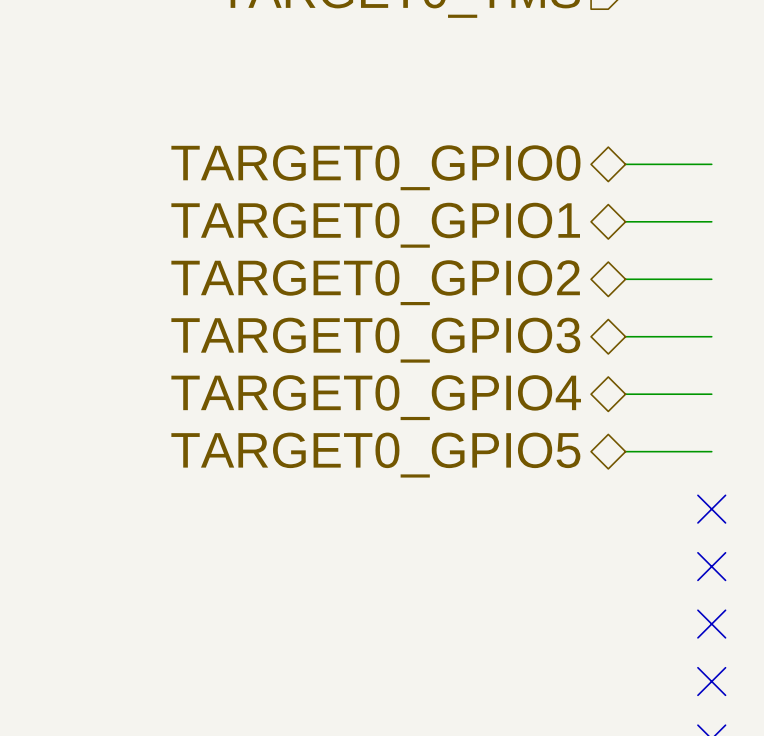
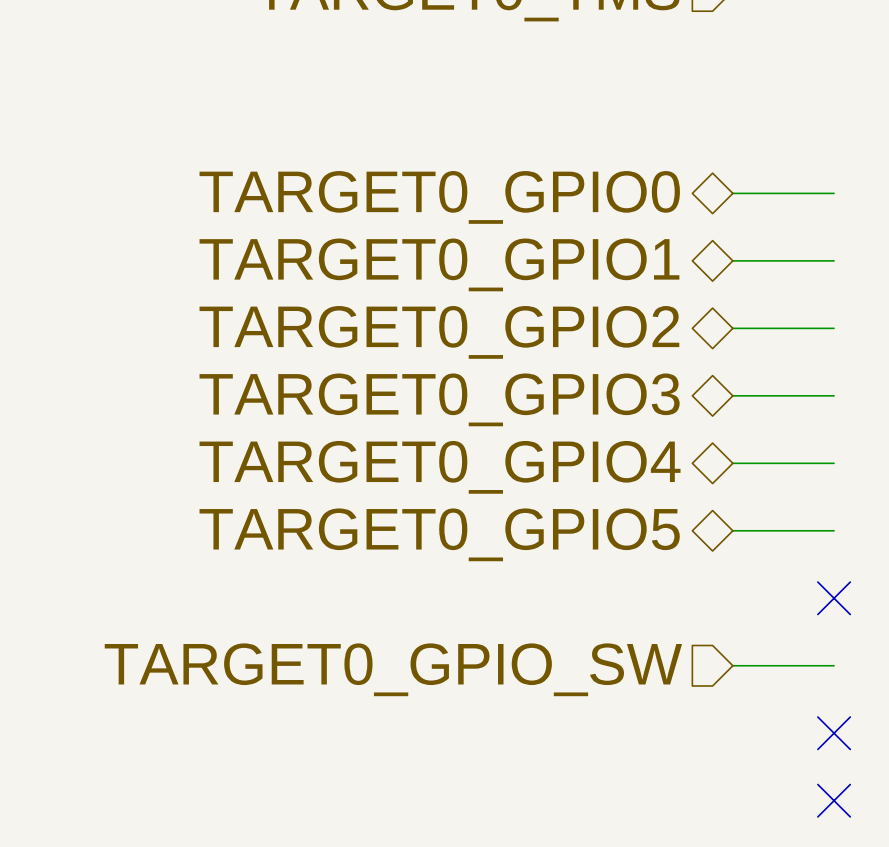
wire: none -> (732, 665) (834, 665)
no-connect mark: (711, 566) -> none
hierarchical label: none -> TARGET0_GPIO_SW (393, 669)

